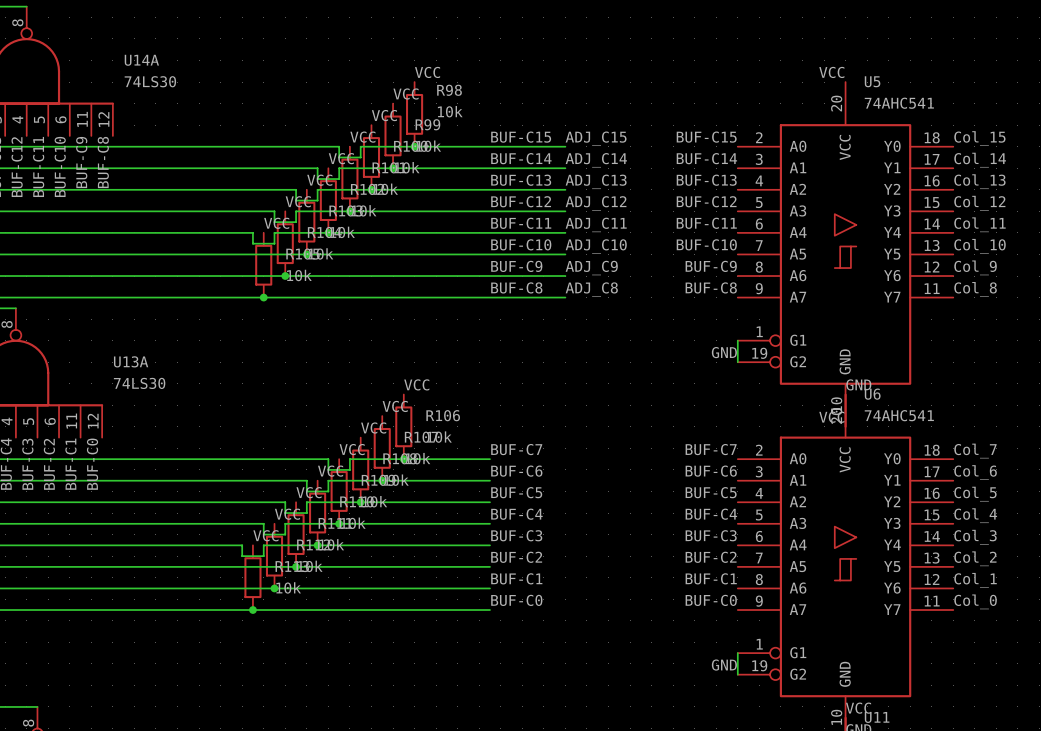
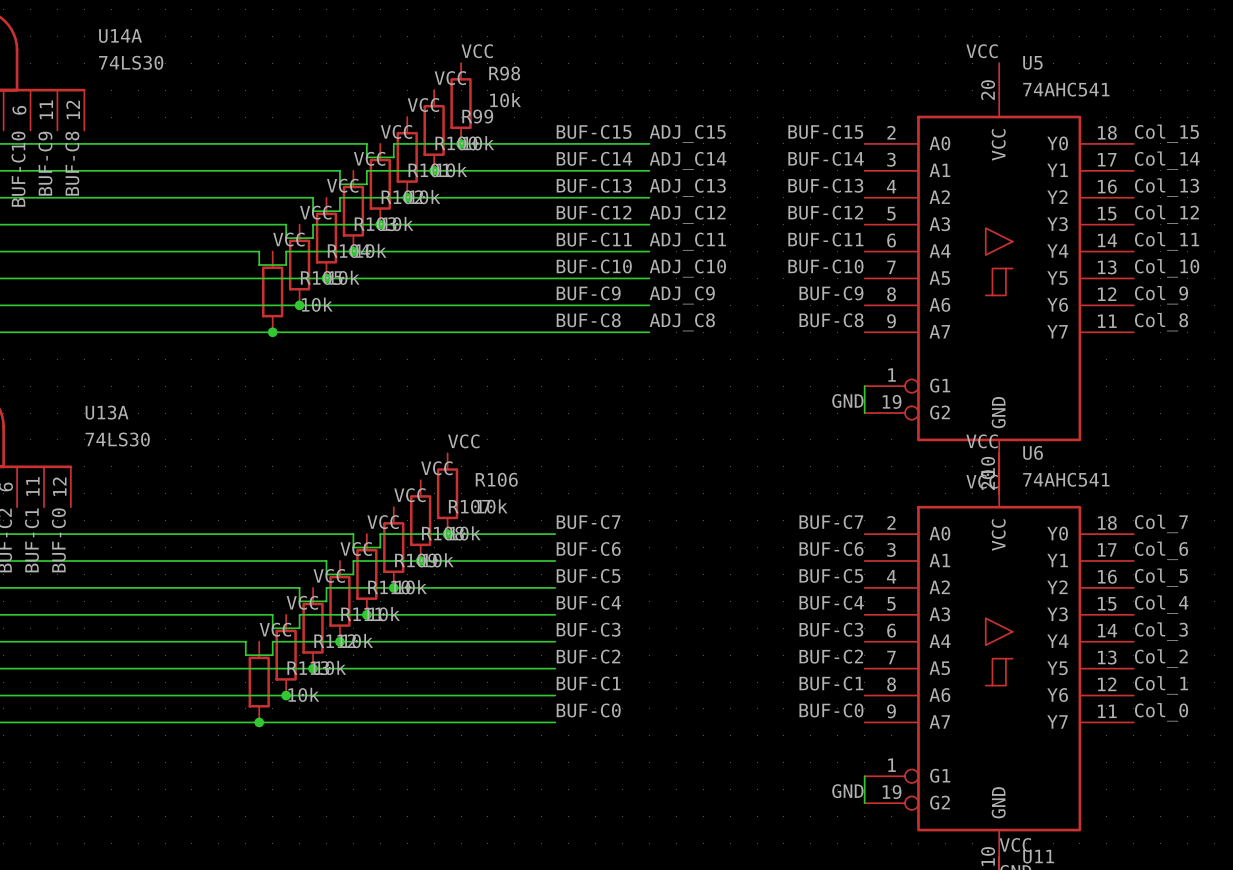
label: GND (858, 384) -> VCC (982, 441)

